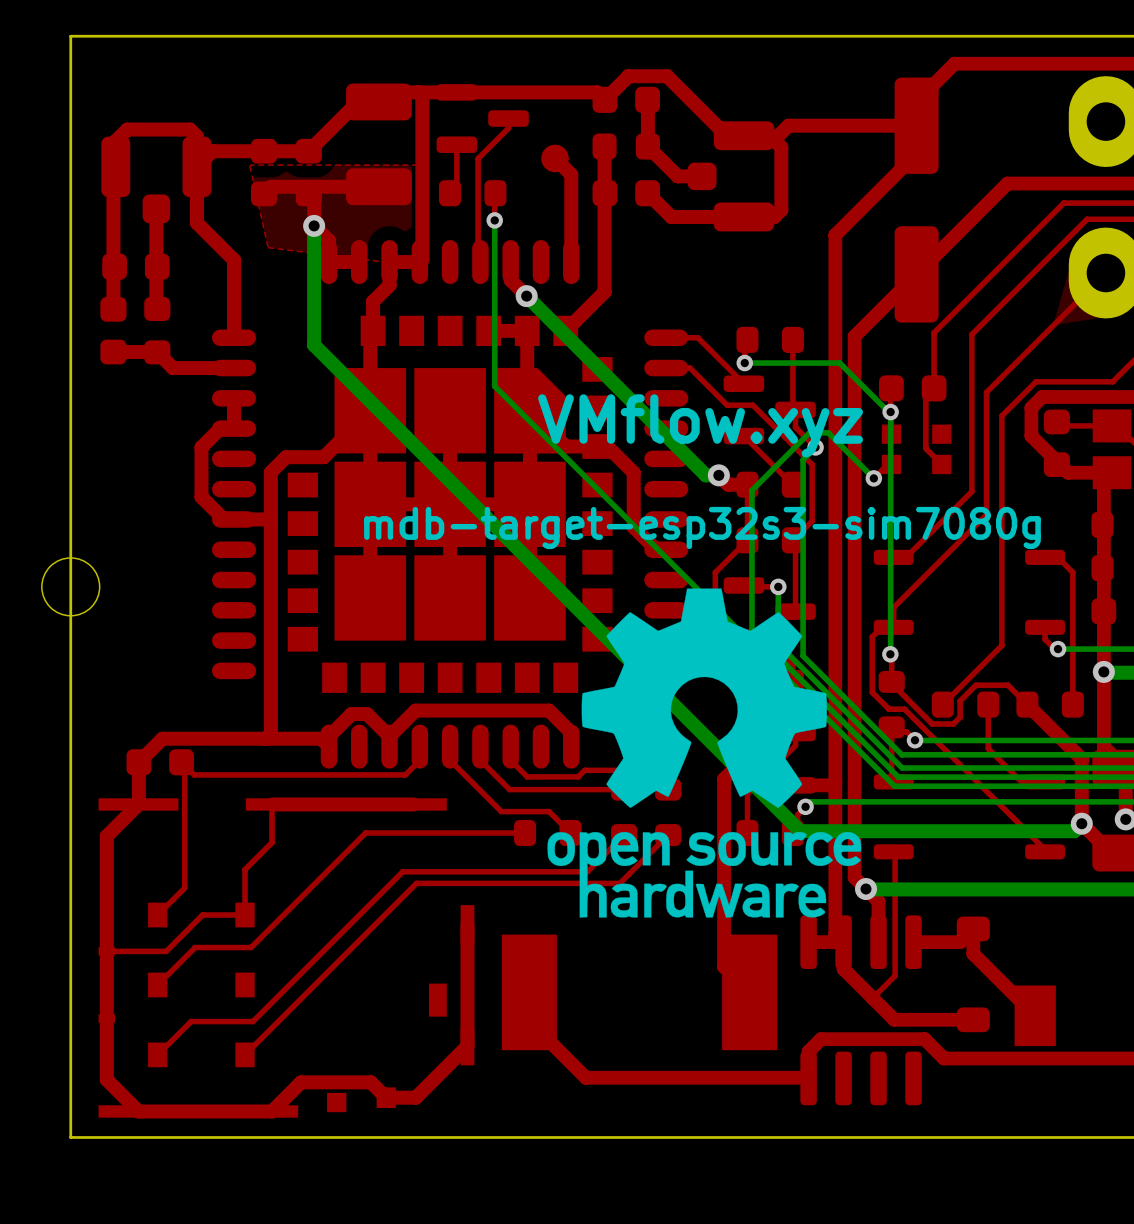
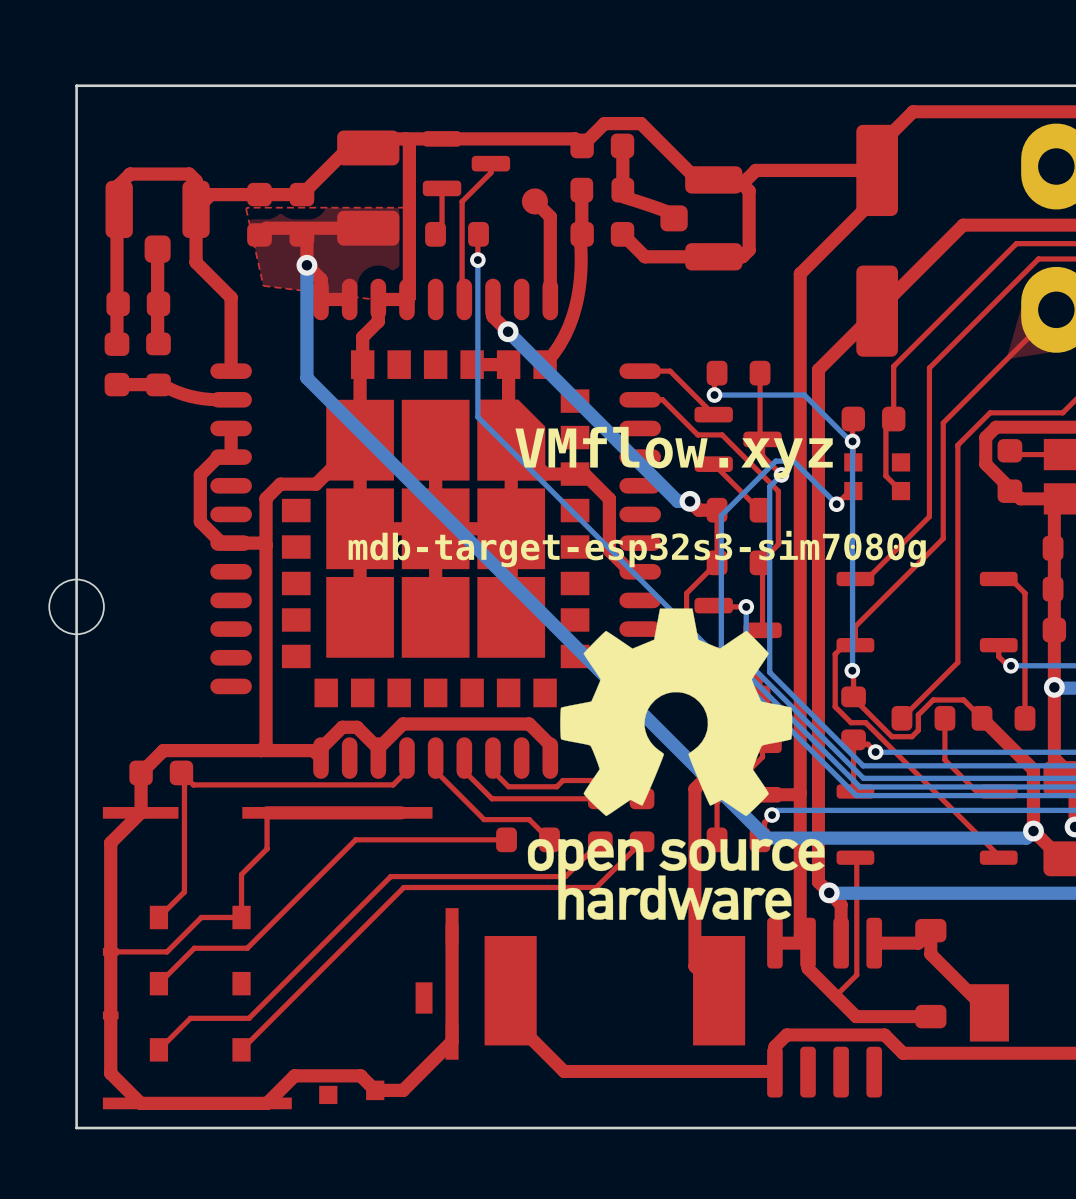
top track: (647, 146) (677, 176) (702, 176) -> none
top track: none -> (624, 197) (672, 213)
top track: (604, 192) (604, 292) (565, 330) -> none
top track: none -> (580, 235) (580, 271) (575, 307) (564, 336) (545, 362)
top track: none -> (156, 380) (170, 389) (190, 396) (228, 399)
top track: (157, 352) (172, 368) (234, 368) -> none

